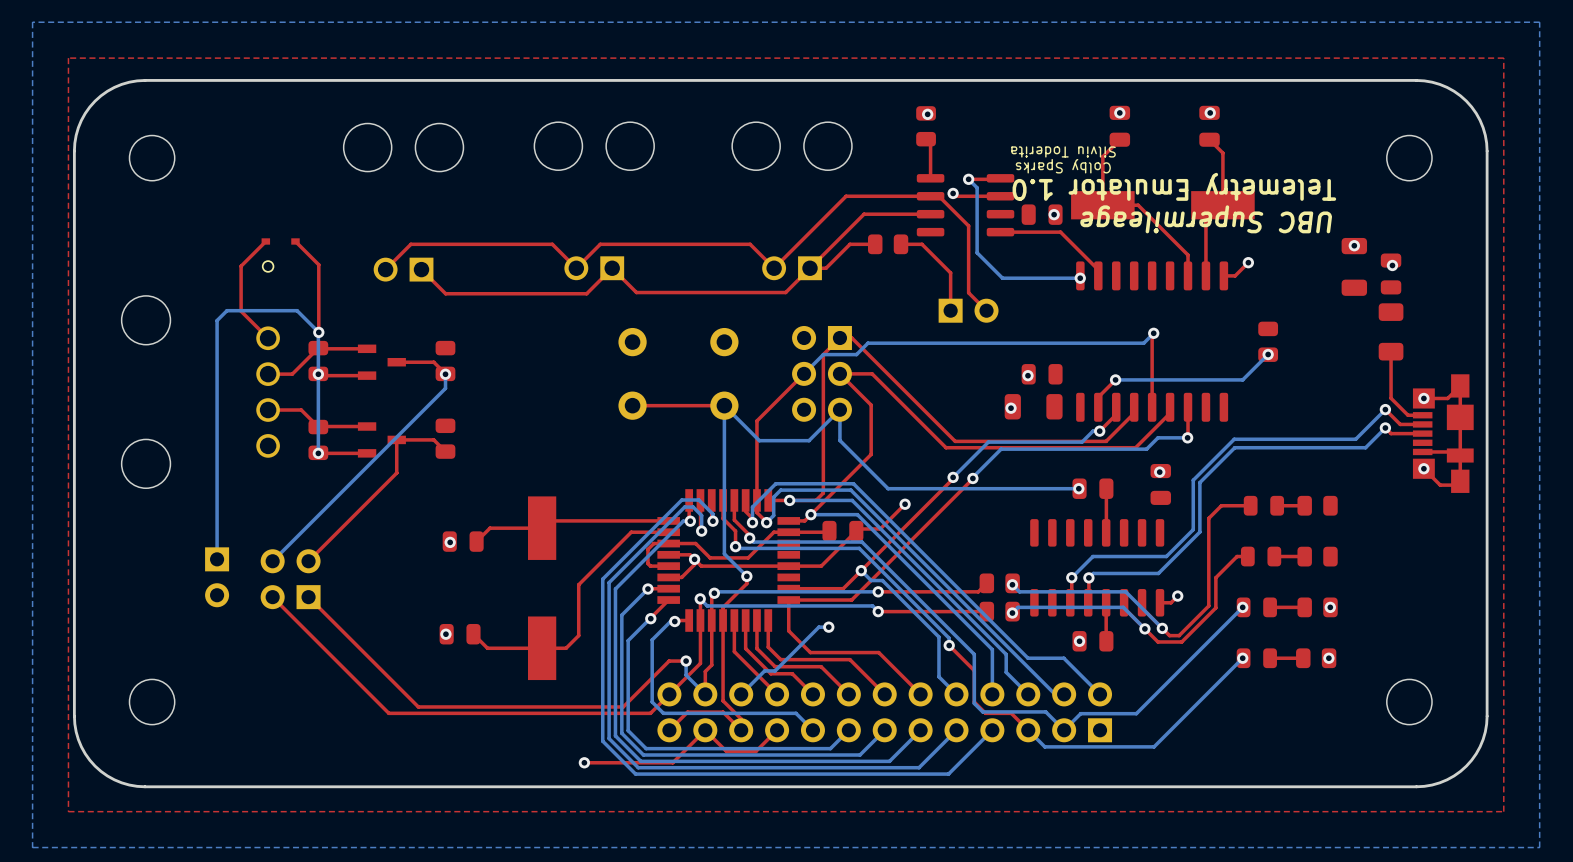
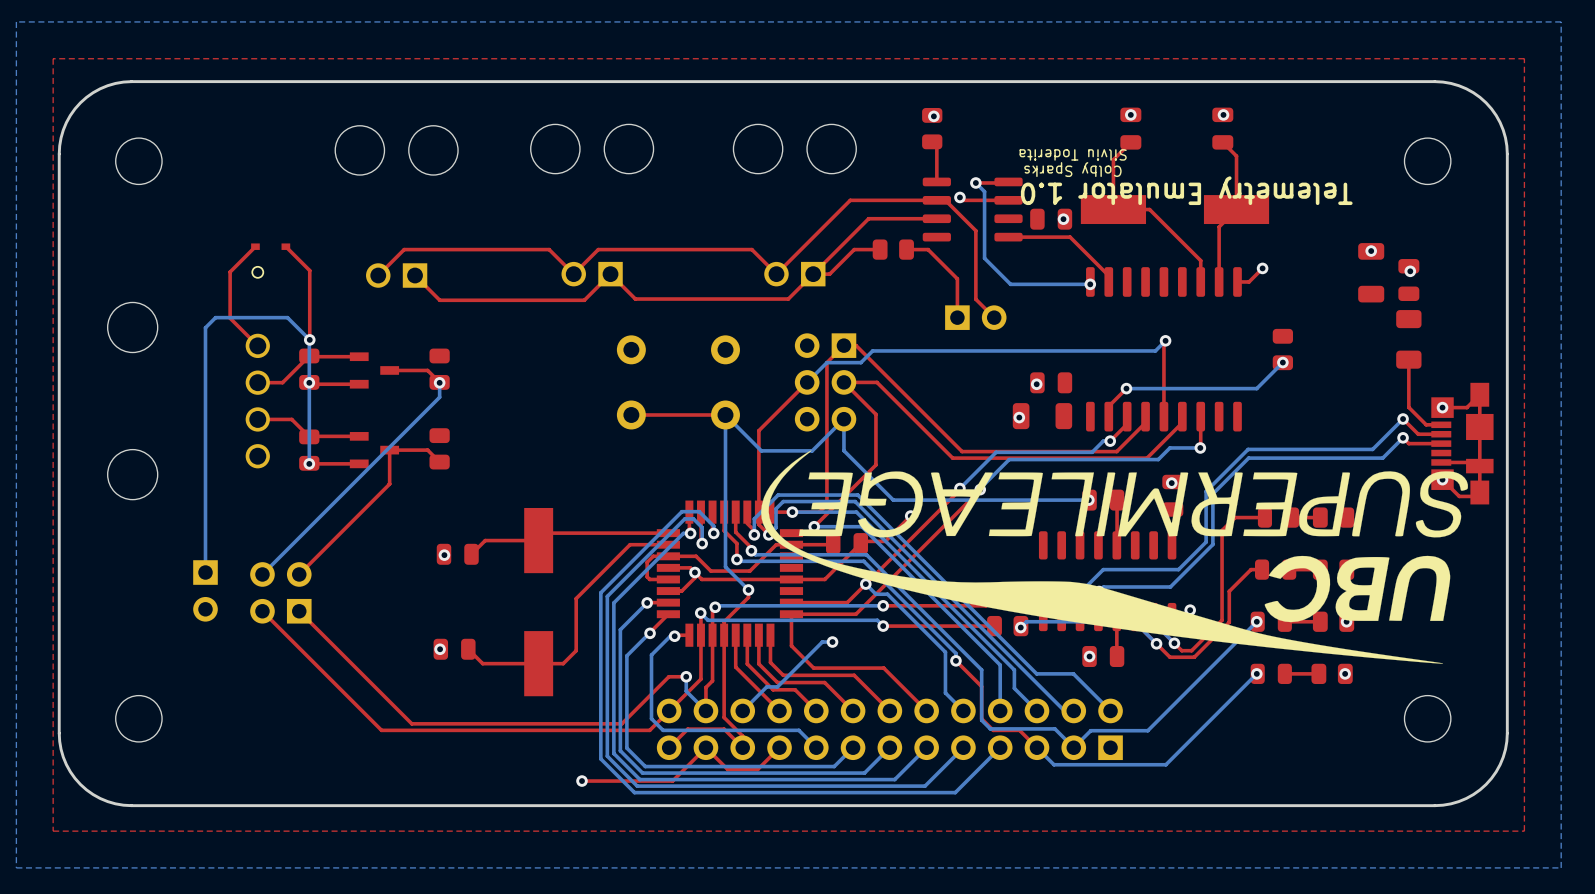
text: UBC Supermileage (1206, 219) -> none
drawing: none -> [761, 450, 1468, 664]

